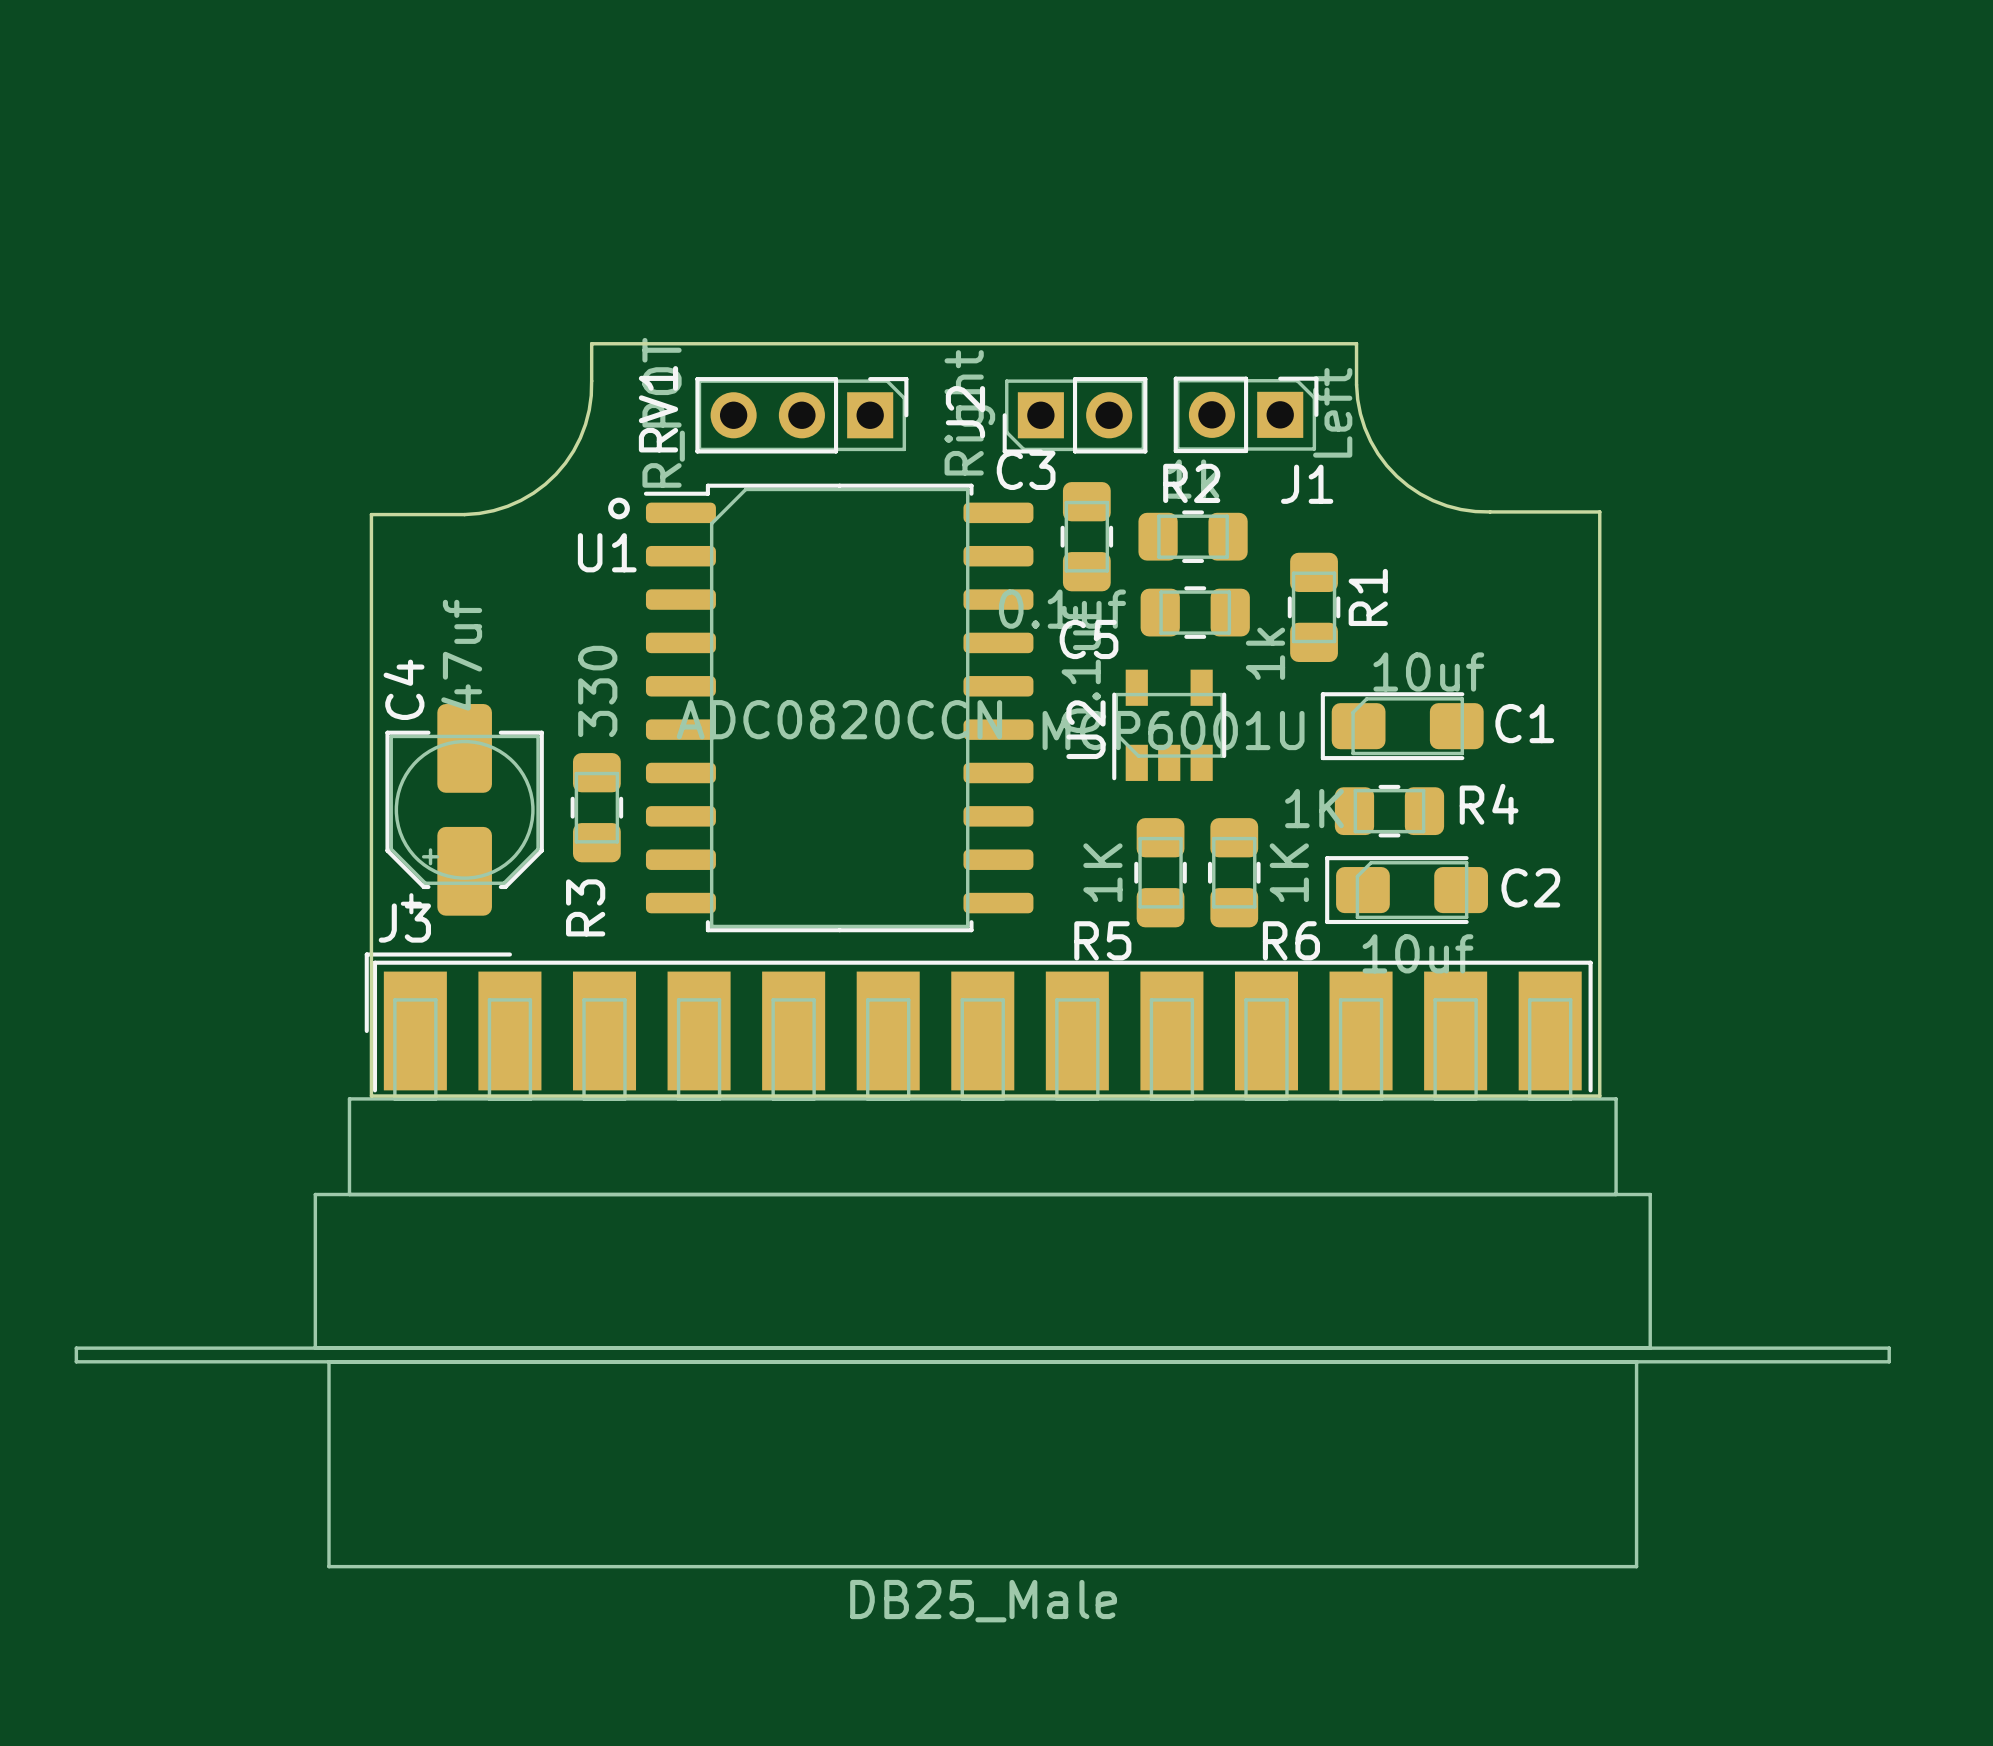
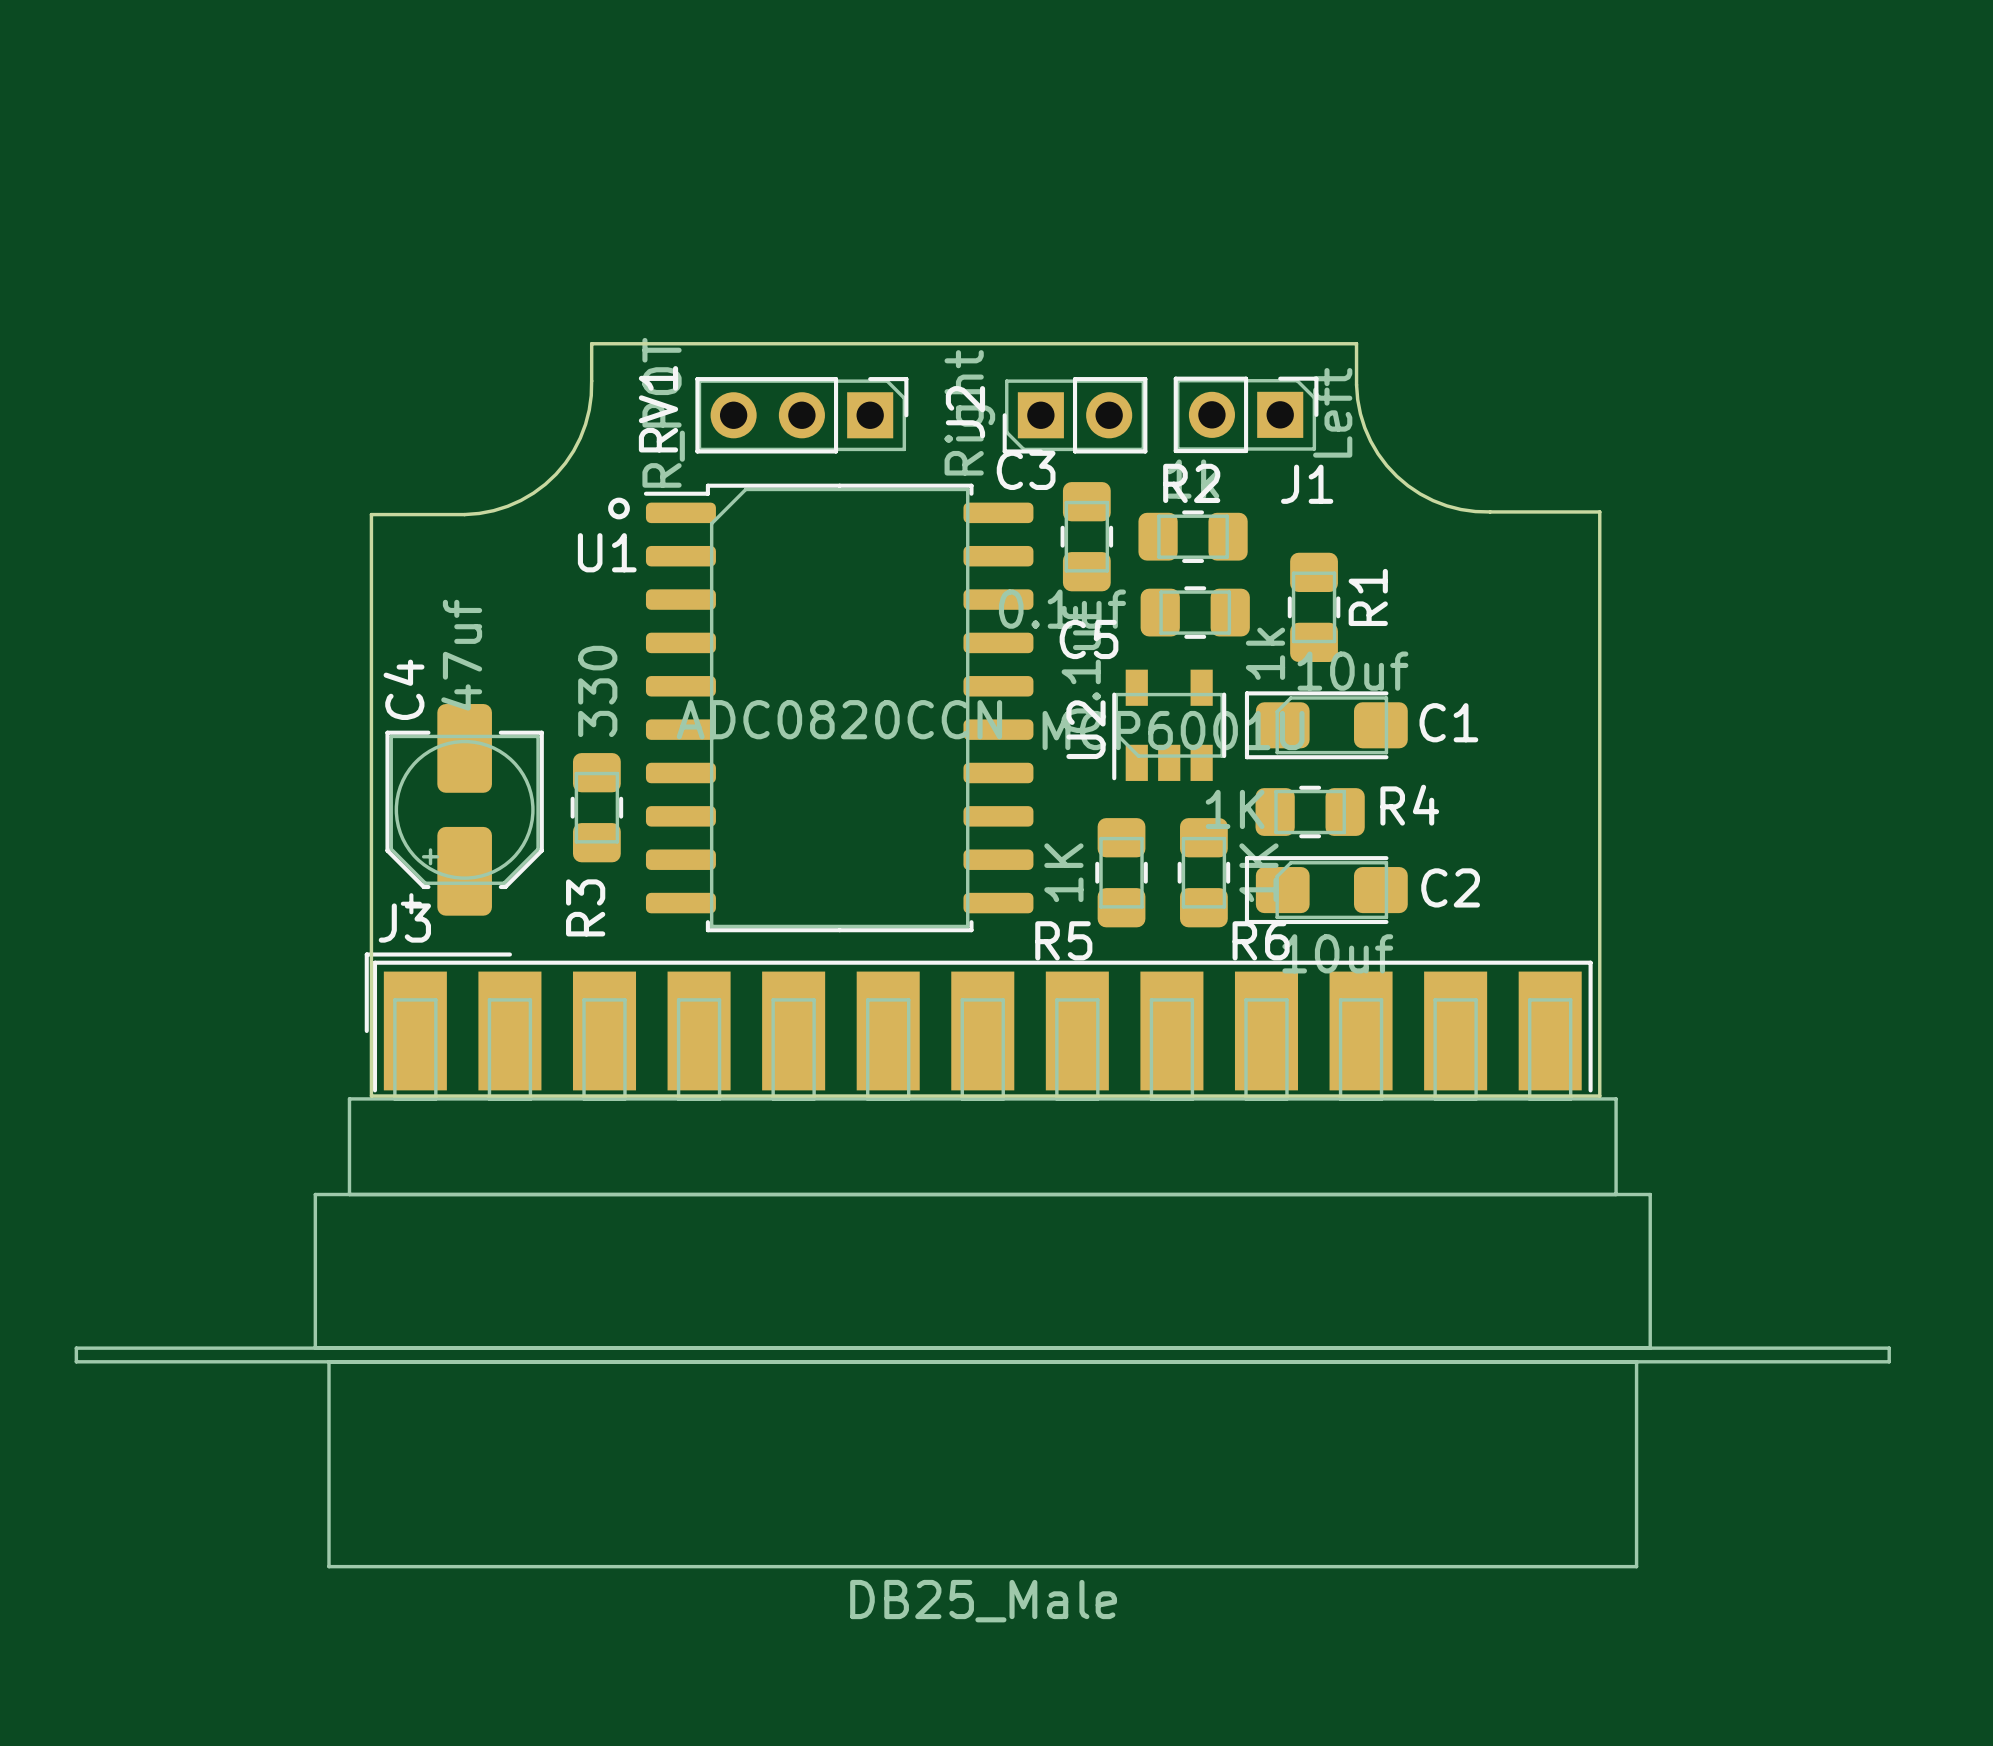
C1 position: (1402, 726) -> (1326, 725)
R4 position: (1389, 811) -> (1310, 812)
R5 position: (1160, 872) -> (1121, 872)
R6 position: (1234, 872) -> (1203, 872)
C2 position: (1406, 890) -> (1326, 890)

